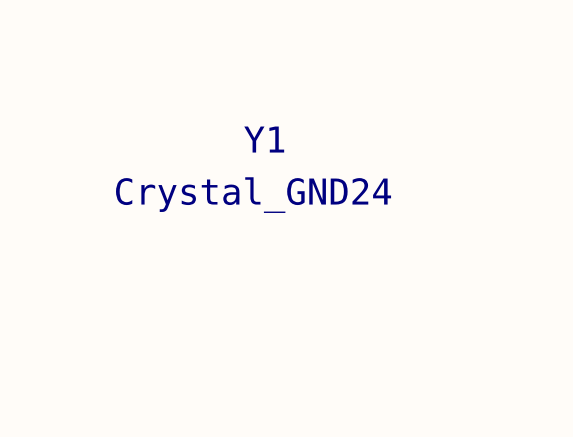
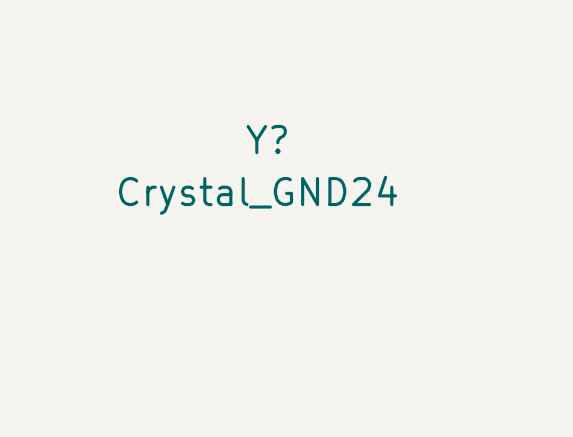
Y1 name: Y1 (264, 139) -> Y? (266, 139)

